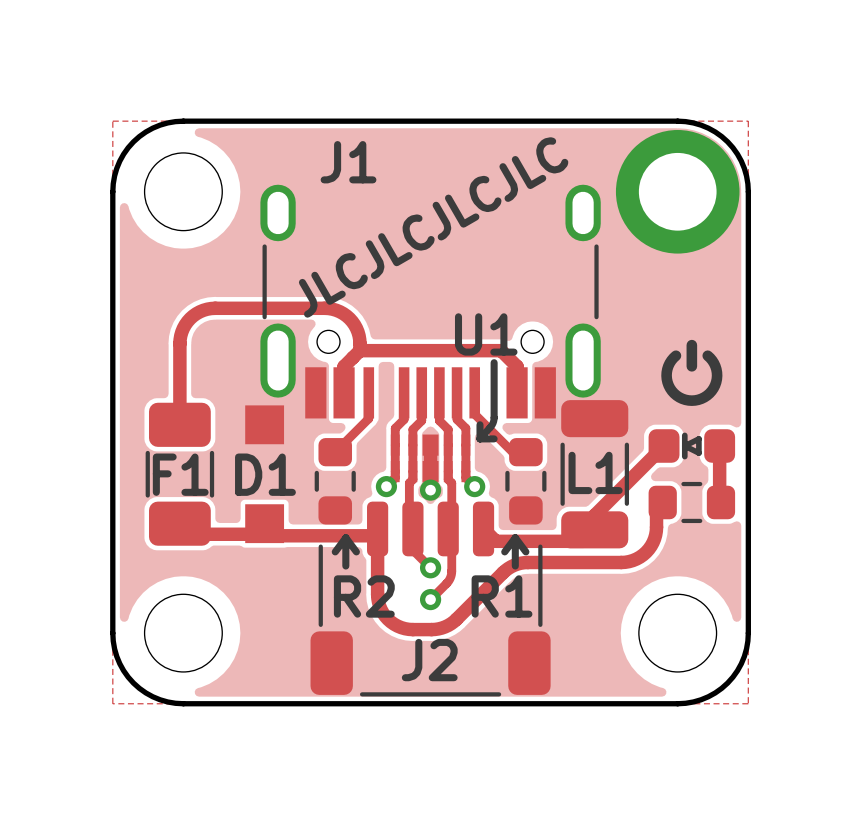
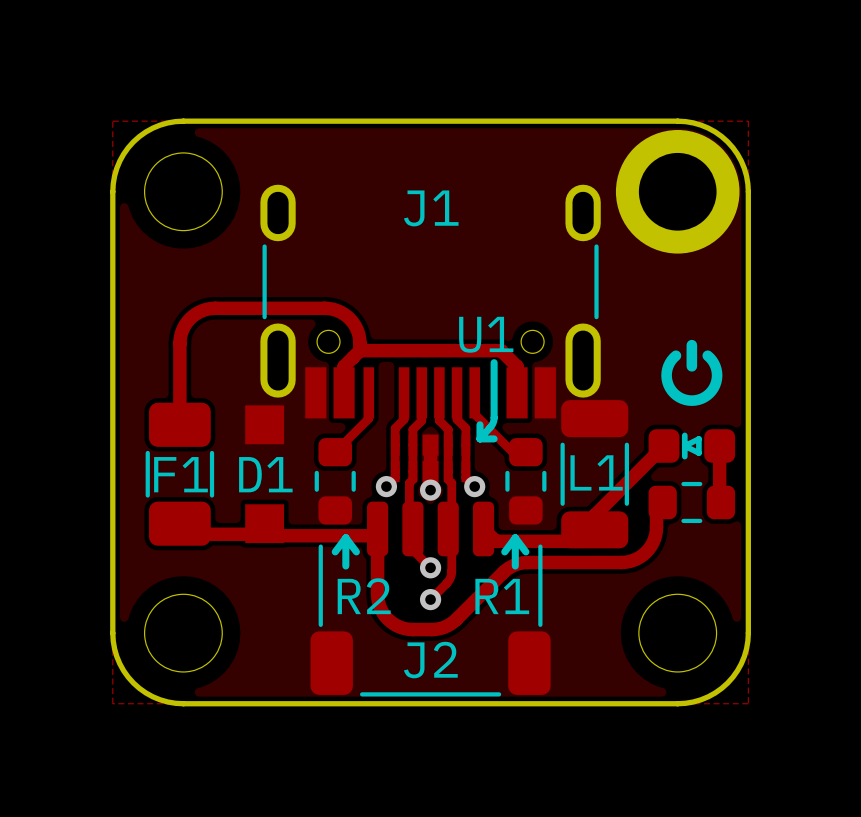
J1 name position: J1 (348, 162) -> J1 (431, 208)
text: JLCJLCJLCJLC (433, 227) -> none

